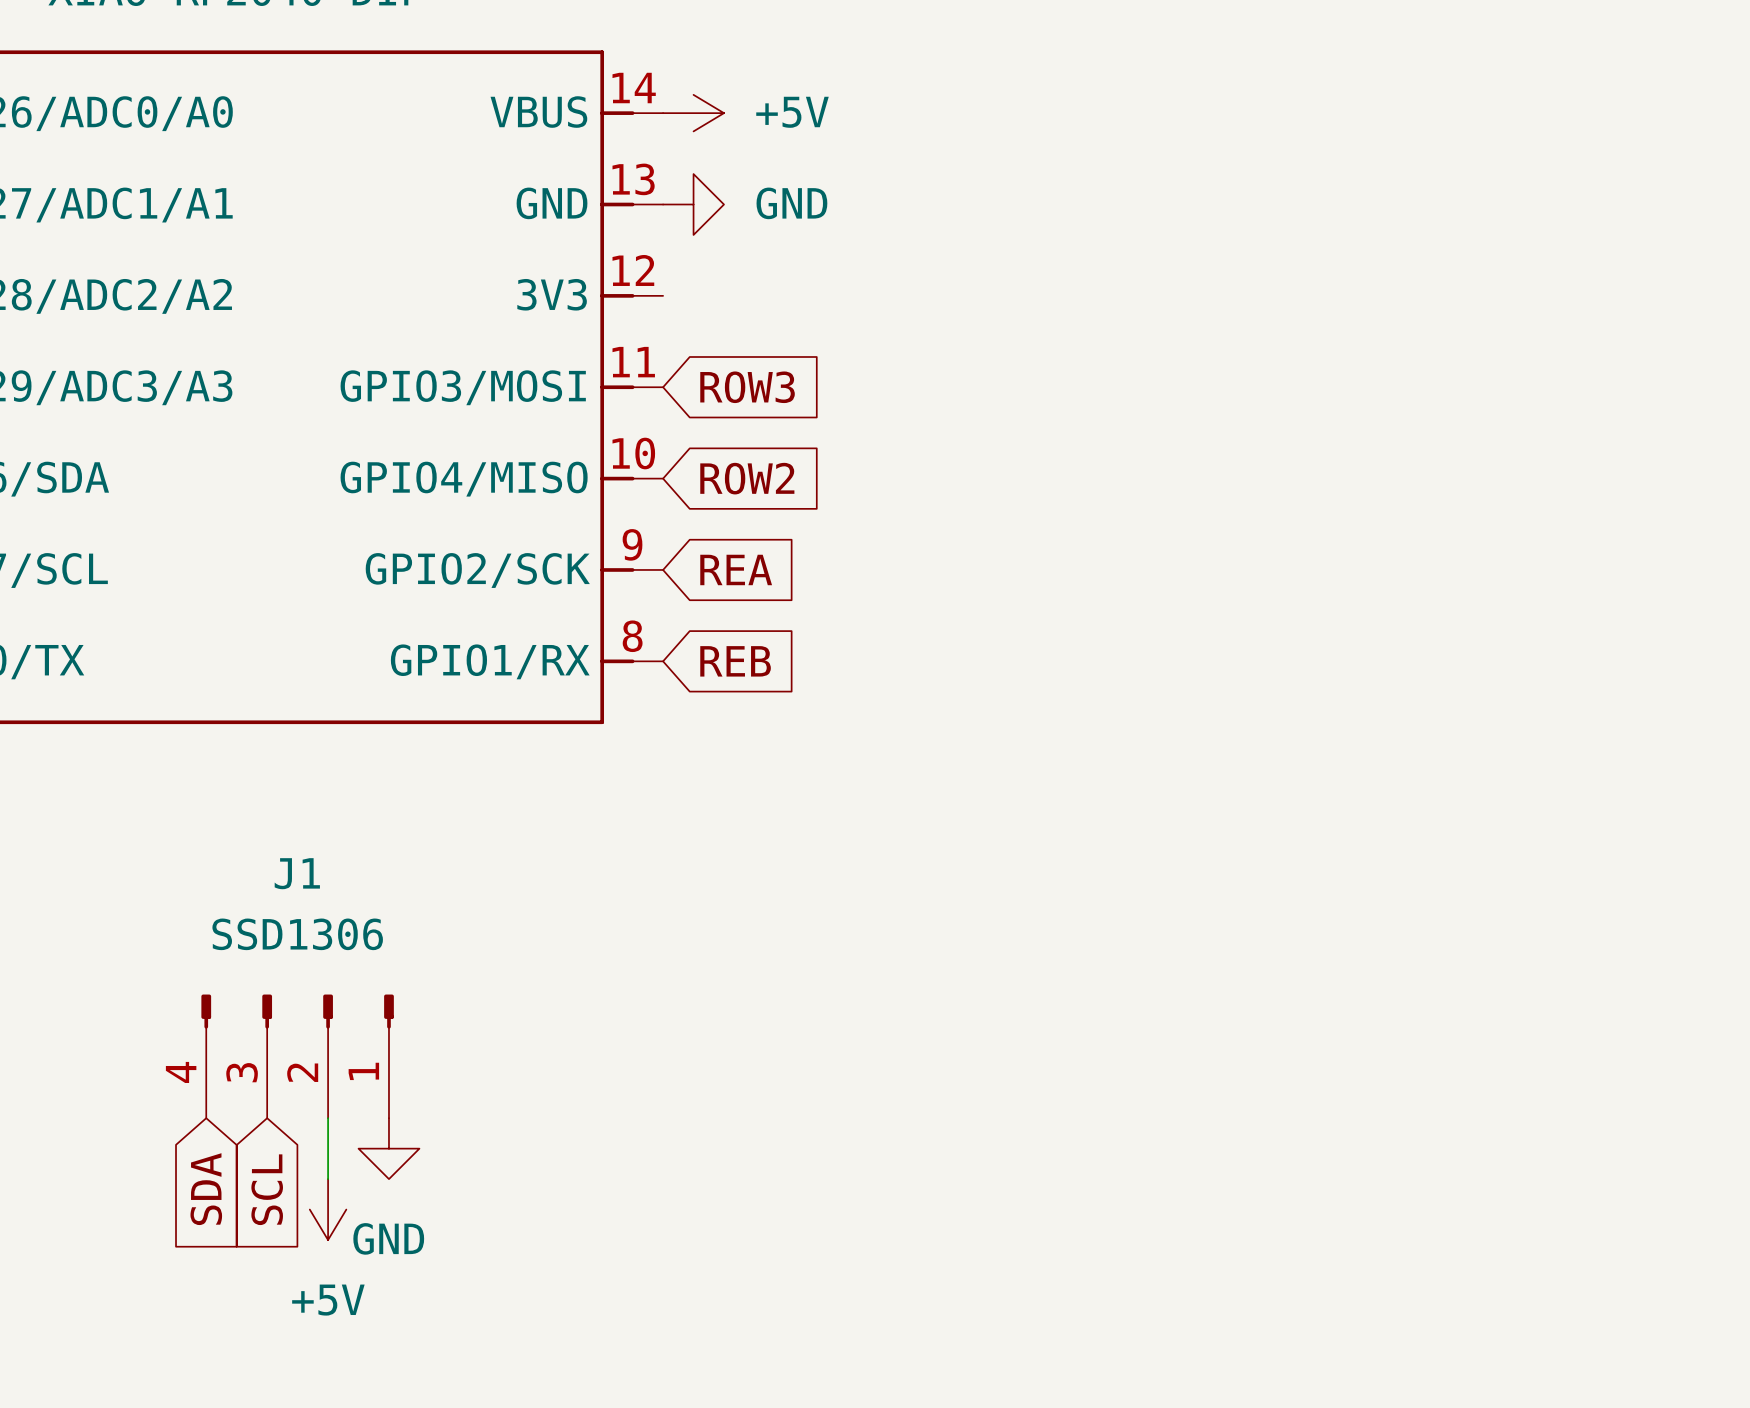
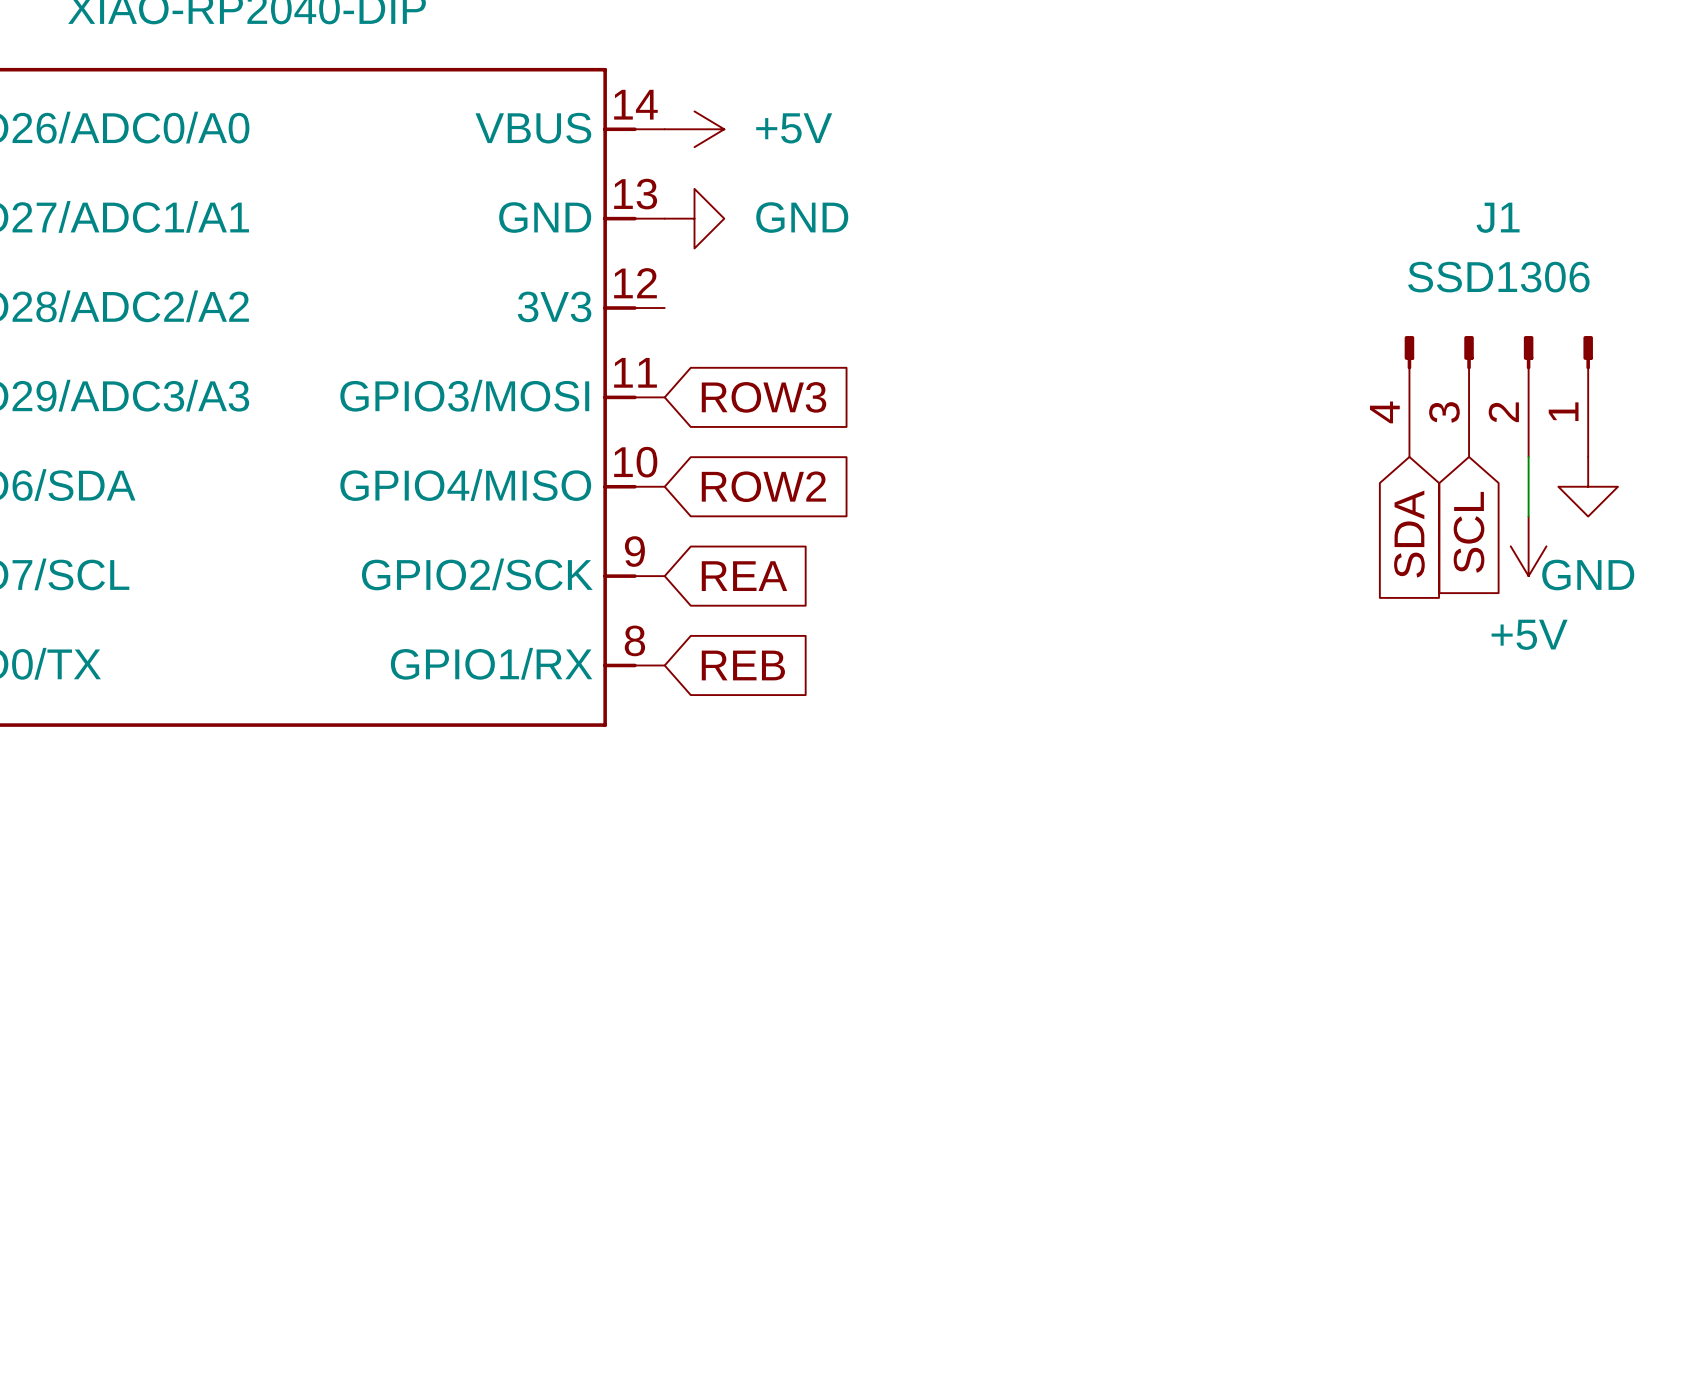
wire: none -> (1528, 456) (1528, 516)
power symbol: none -> GND (1588, 486)
global label: none -> SDA (1409, 534)
global label: none -> SCL (1469, 532)
power symbol: none -> +5V (1528, 546)
J1 position: (297, 1056) -> (1498, 396)
wire: (328, 1118) (328, 1179) -> none
power symbol: GND (388, 1148) -> none
global label: SDA (206, 1189) -> none
global label: SCL (267, 1189) -> none
power symbol: +5V (328, 1209) -> none

